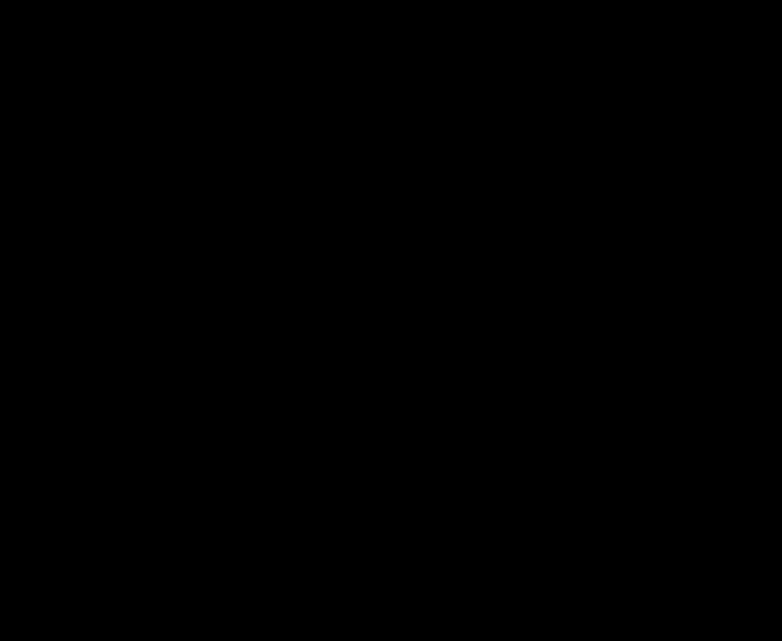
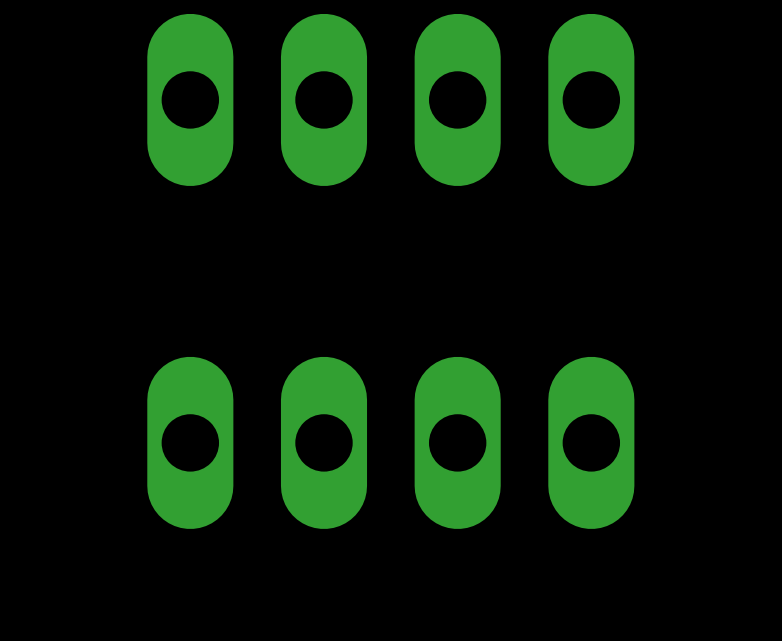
part: none -> (390, 99)
part: none -> (390, 442)

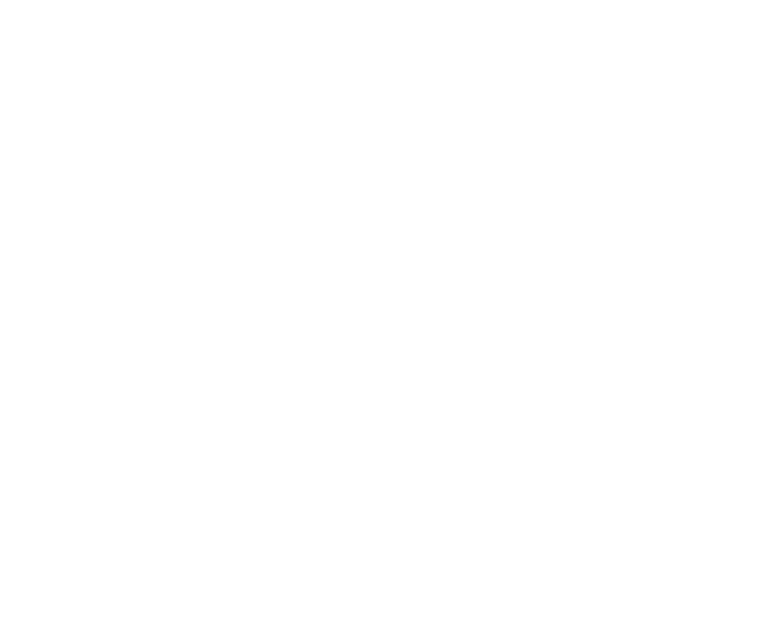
part: (390, 99) -> none
part: (390, 442) -> none

